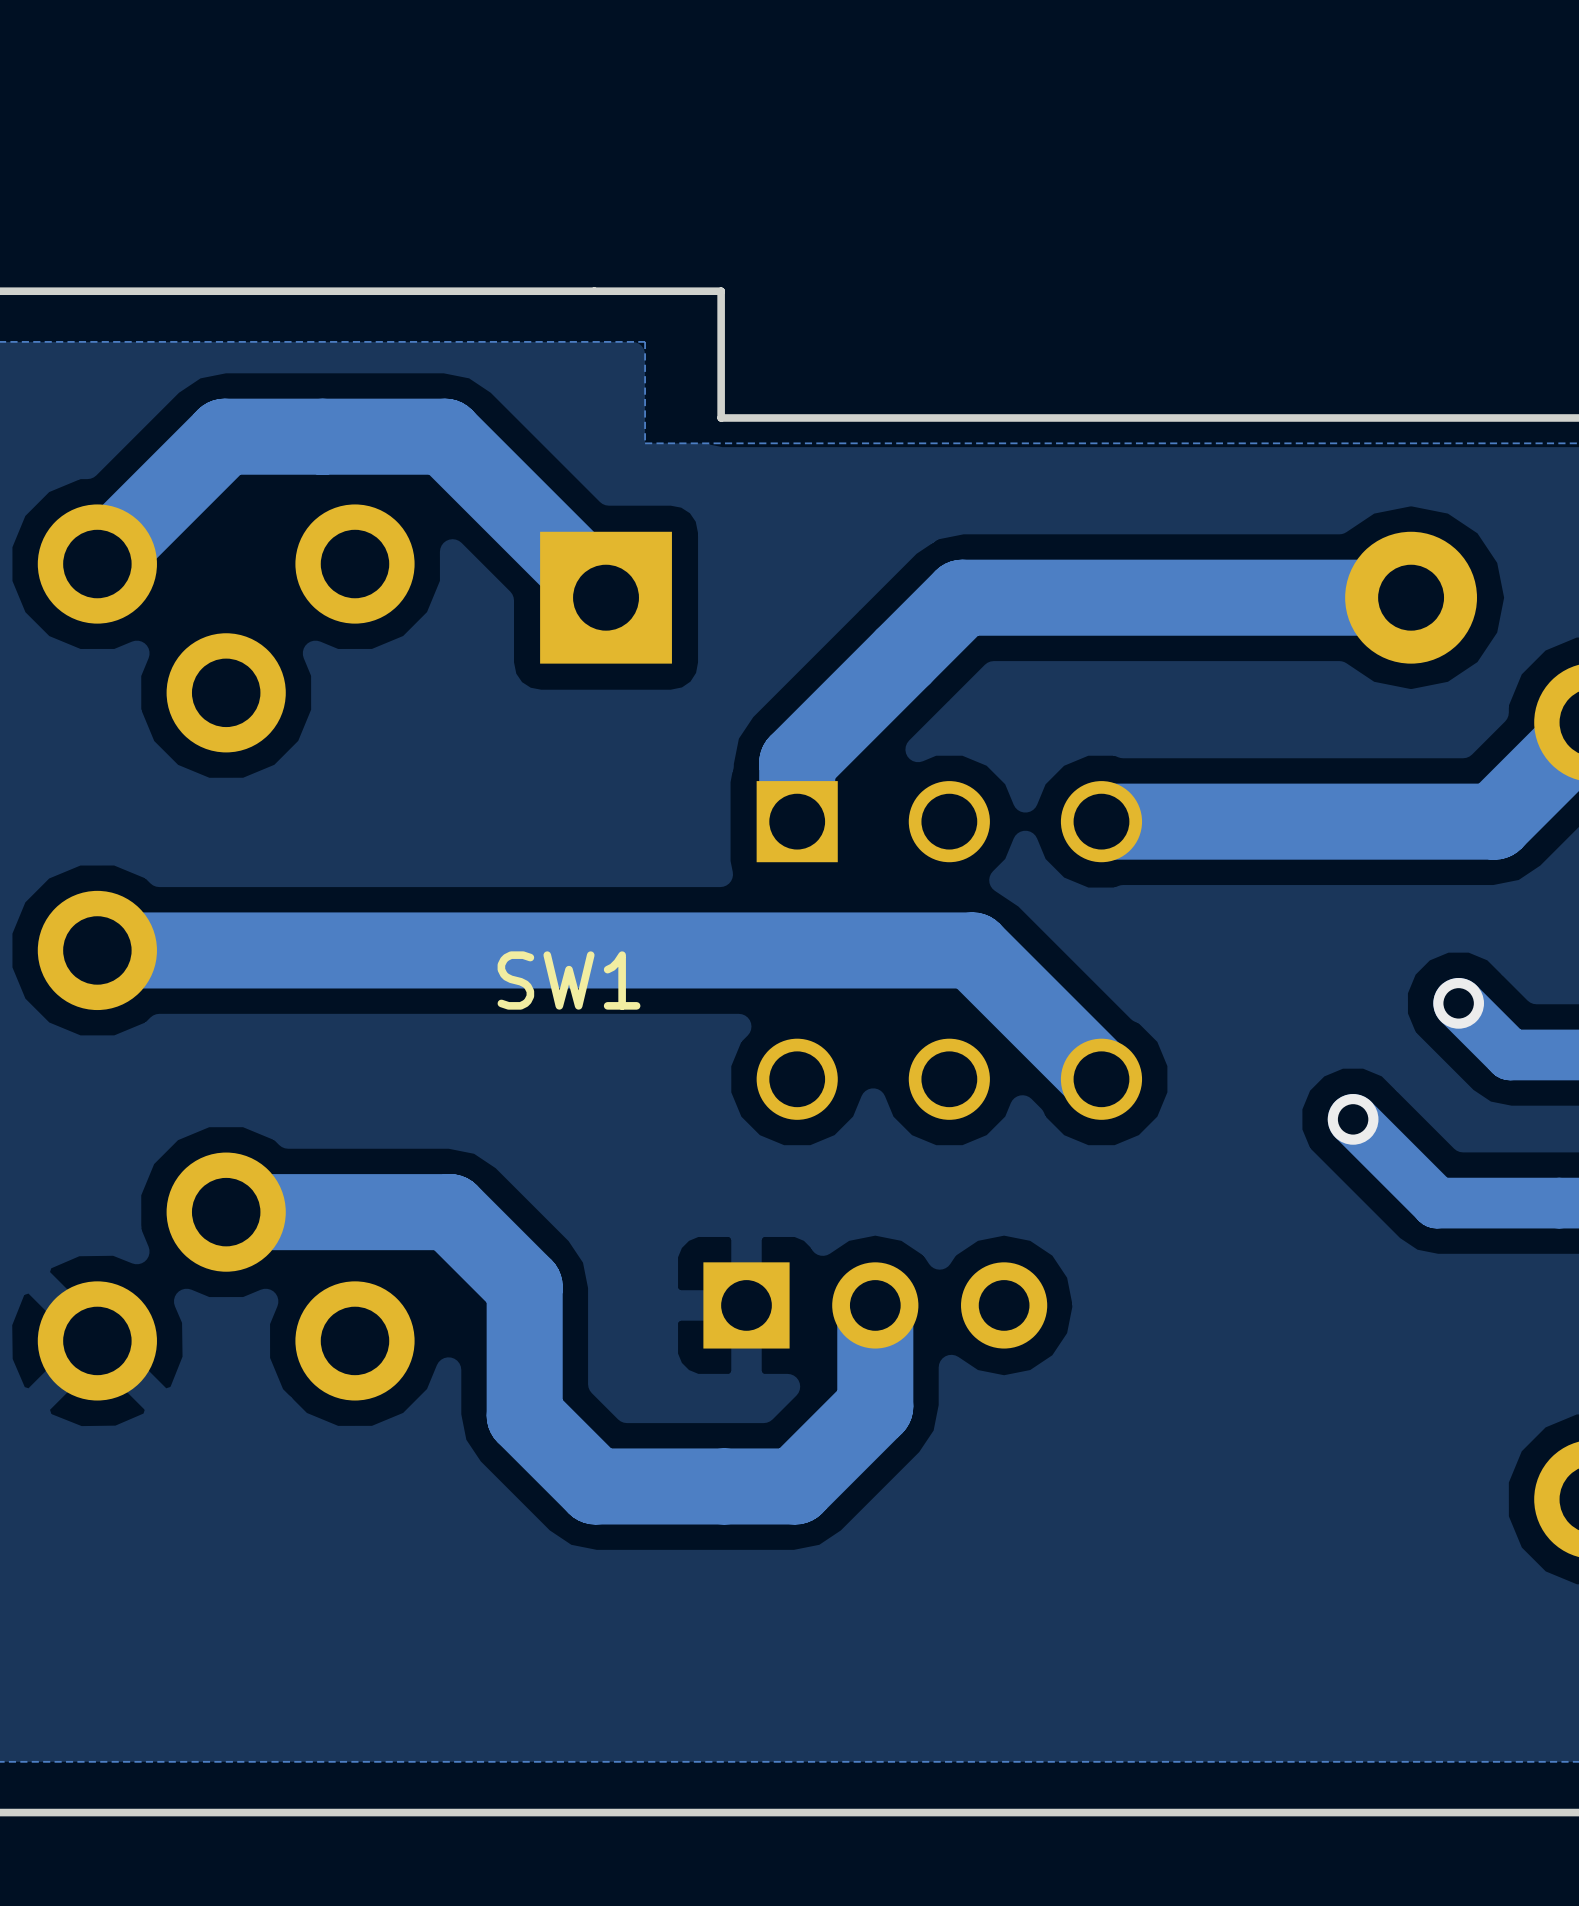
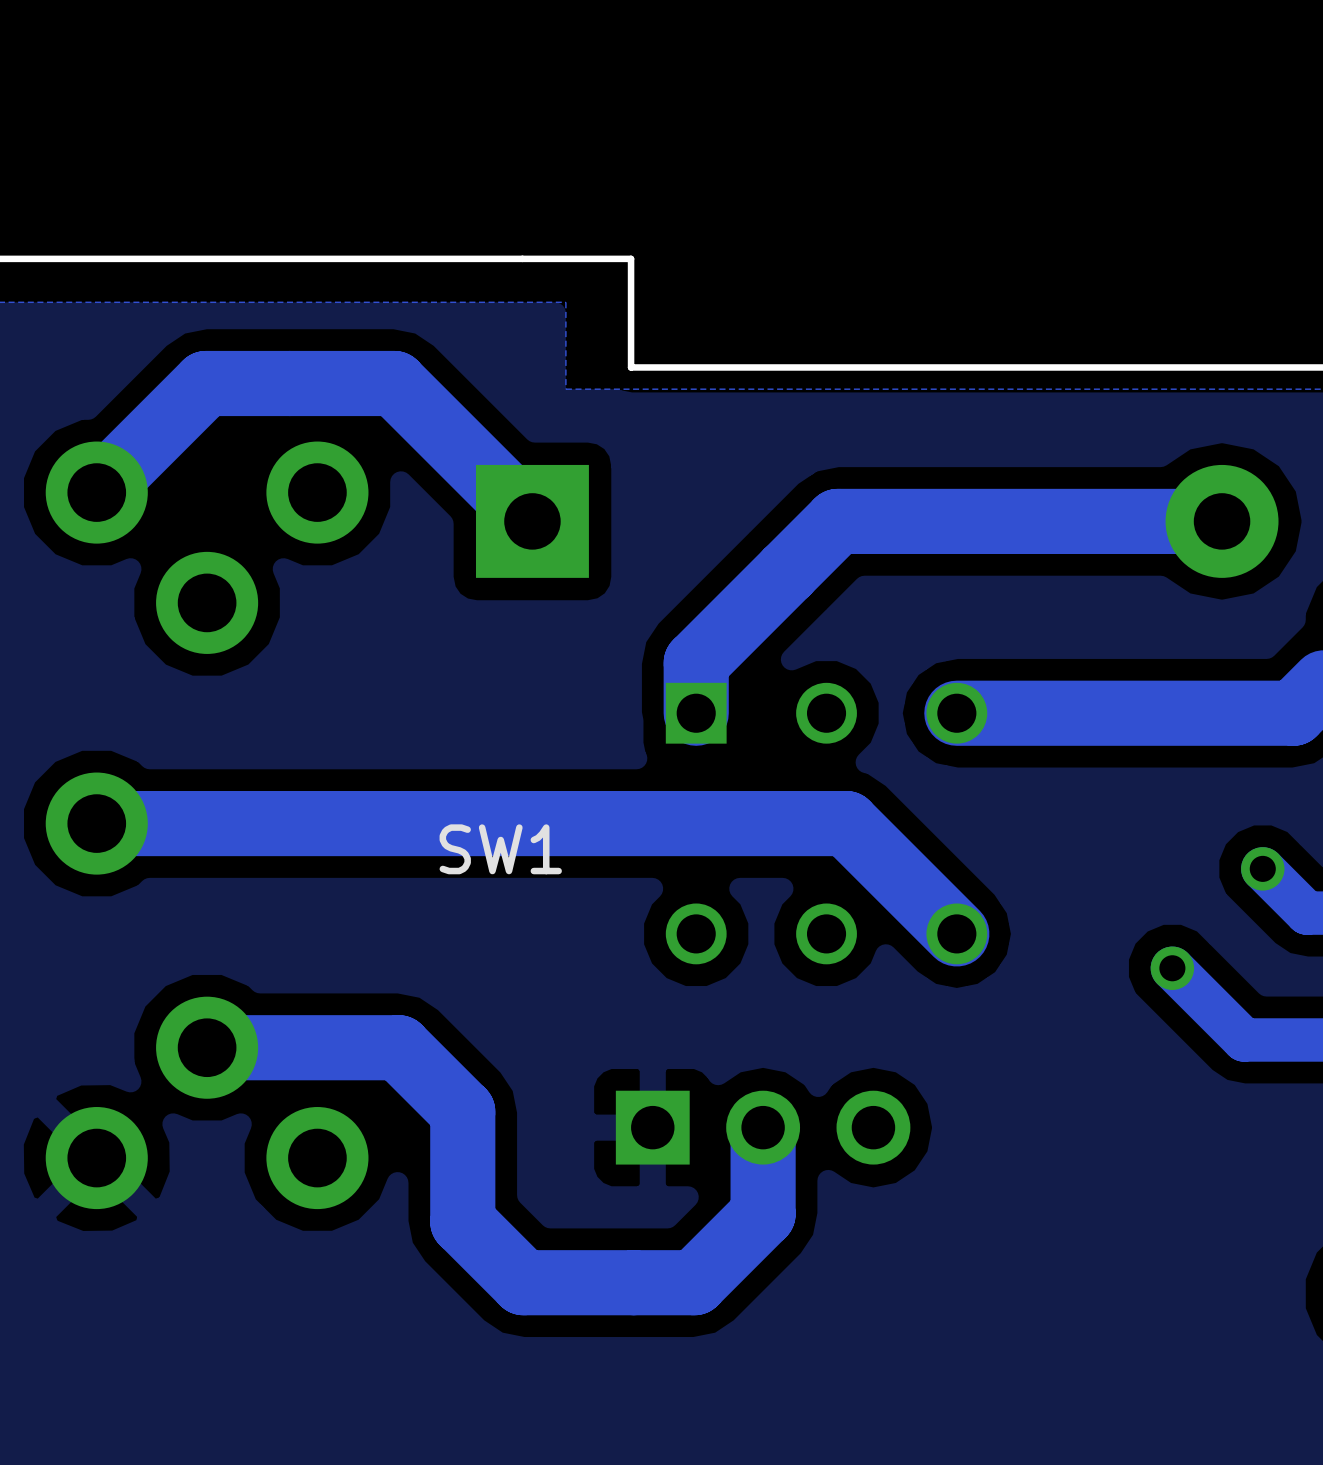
SW1 footprint: [756, 781, 1143, 1120] -> [665, 682, 988, 965]

